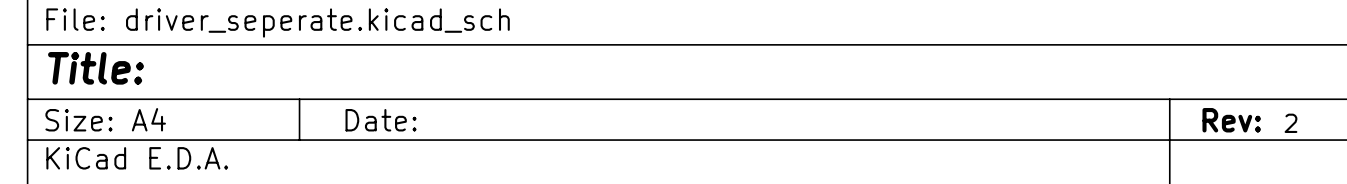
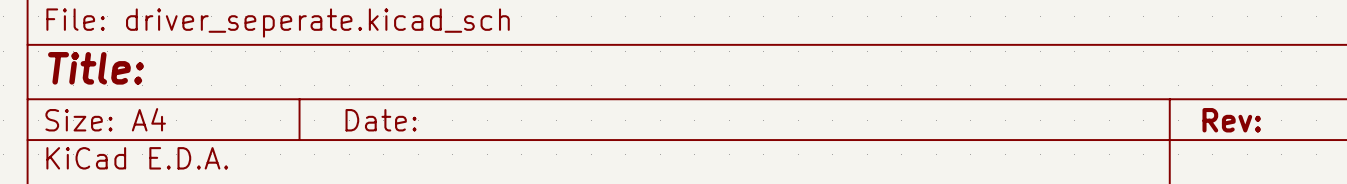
text: 2 (1290, 123) -> none

